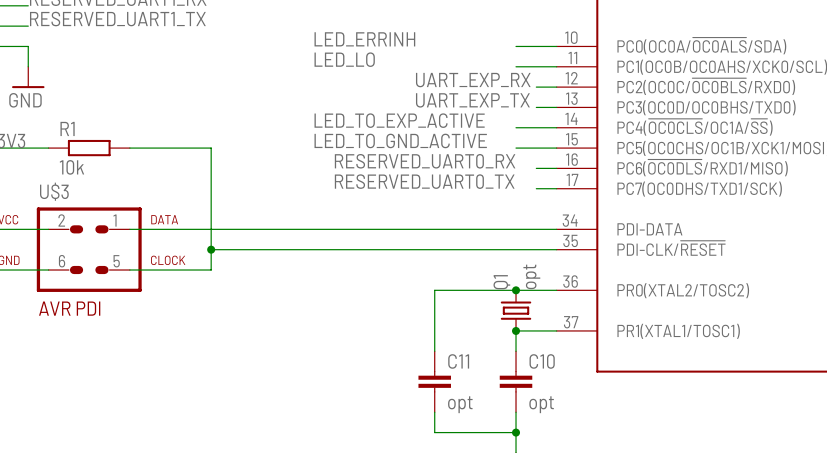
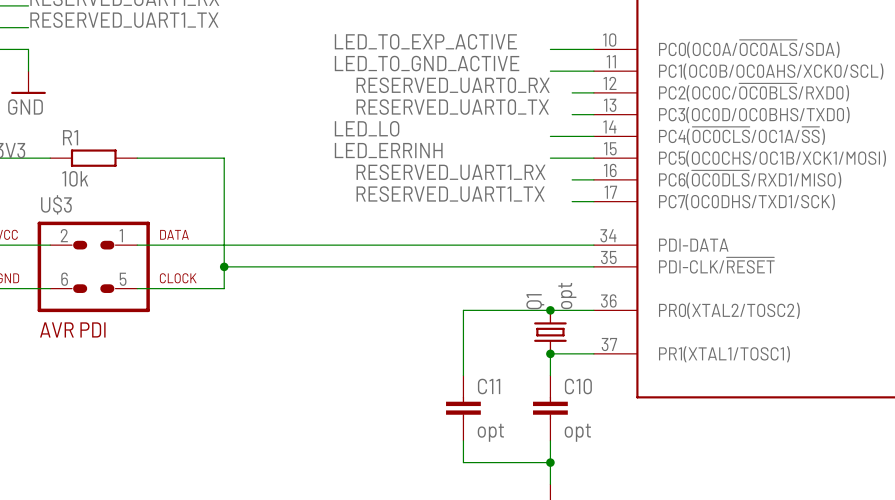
label: LED_ERRINH (364, 39) -> LED_TO_EXP_ACTIVE (425, 41)
label: LED_LO (344, 59) -> LED_TO_GND_ACTIVE (427, 63)
label: none -> RESERVED_UART0_RX (453, 85)
label: UART_EXP_RX (473, 80) -> none
label: none -> RESERVED_UART0_TX (452, 107)
label: UART_EXP_TX (472, 100) -> none
label: LED_TO_EXP_ACTIVE (399, 120) -> LED_LO (367, 128)
label: LED_TO_GND_ACTIVE (400, 140) -> LED_ERRINH (388, 150)
label: RESERVED_UART0_RX (425, 161) -> RESERVED_UART1_RX (451, 172)
label: RESERVED_UART0_TX (424, 181) -> RESERVED_UART1_TX (450, 194)

